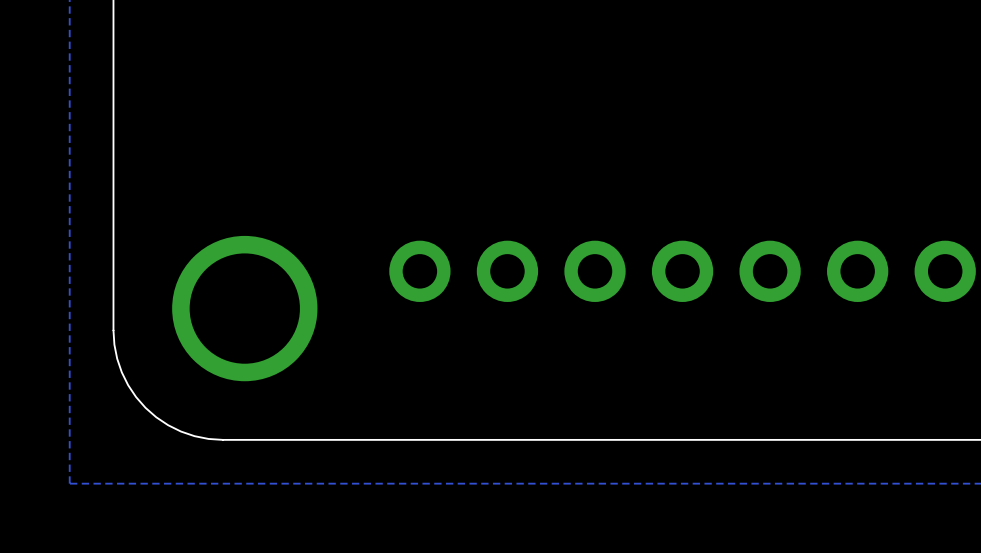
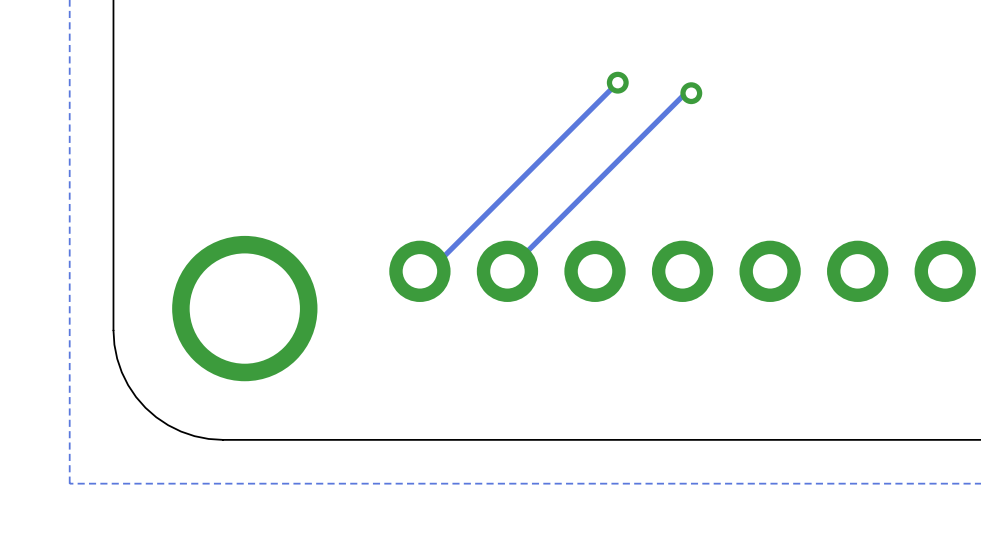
track: none -> (617, 82) (429, 271) (419, 271)
via: none -> (617, 82)
track: none -> (691, 93) (685, 93) (507, 271)
via: none -> (691, 93)

